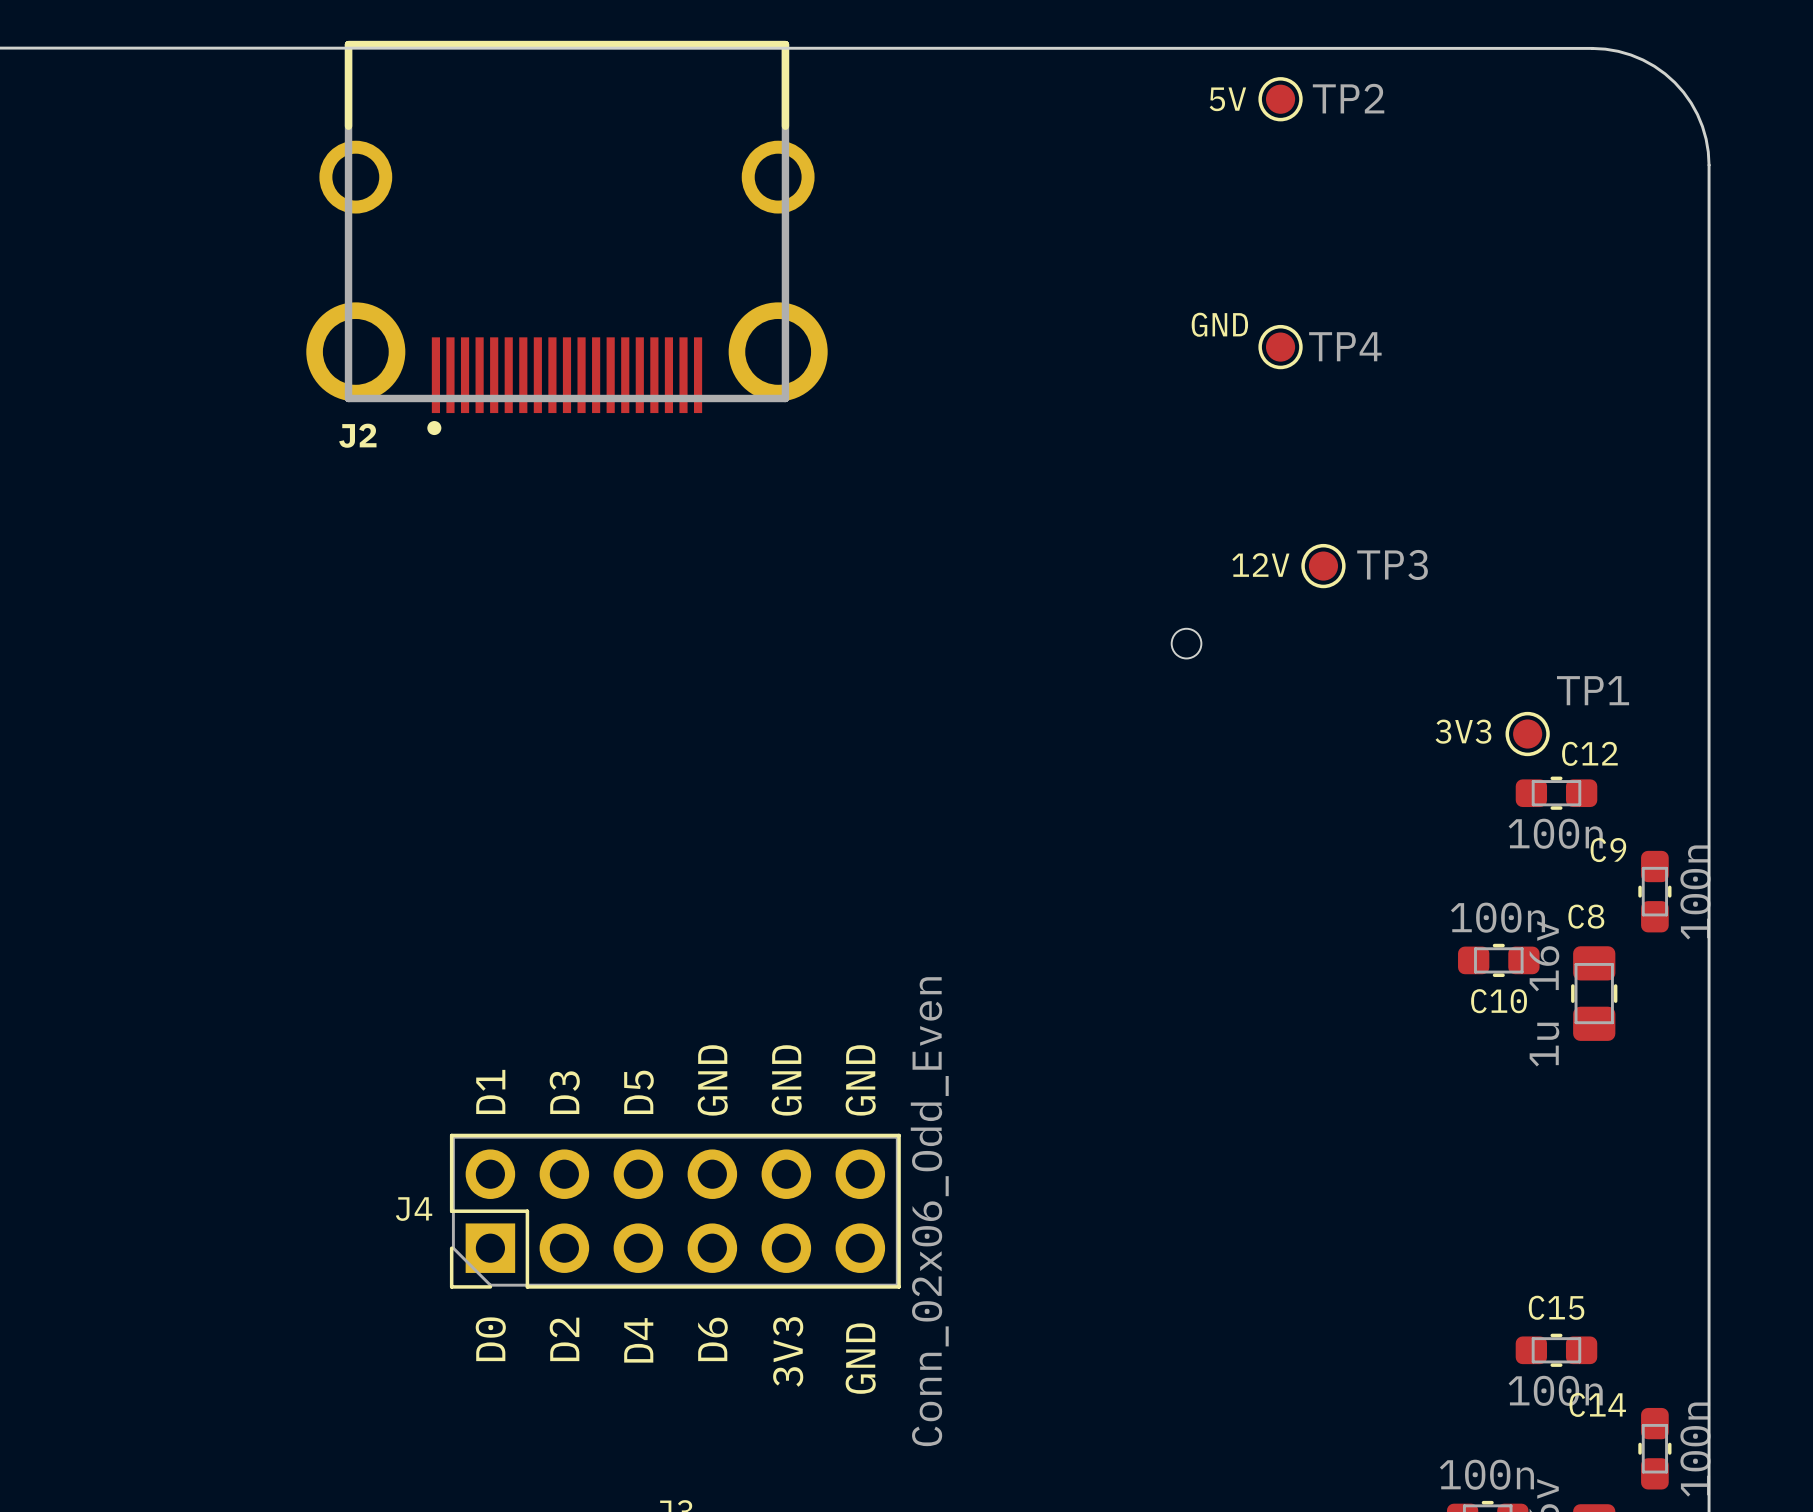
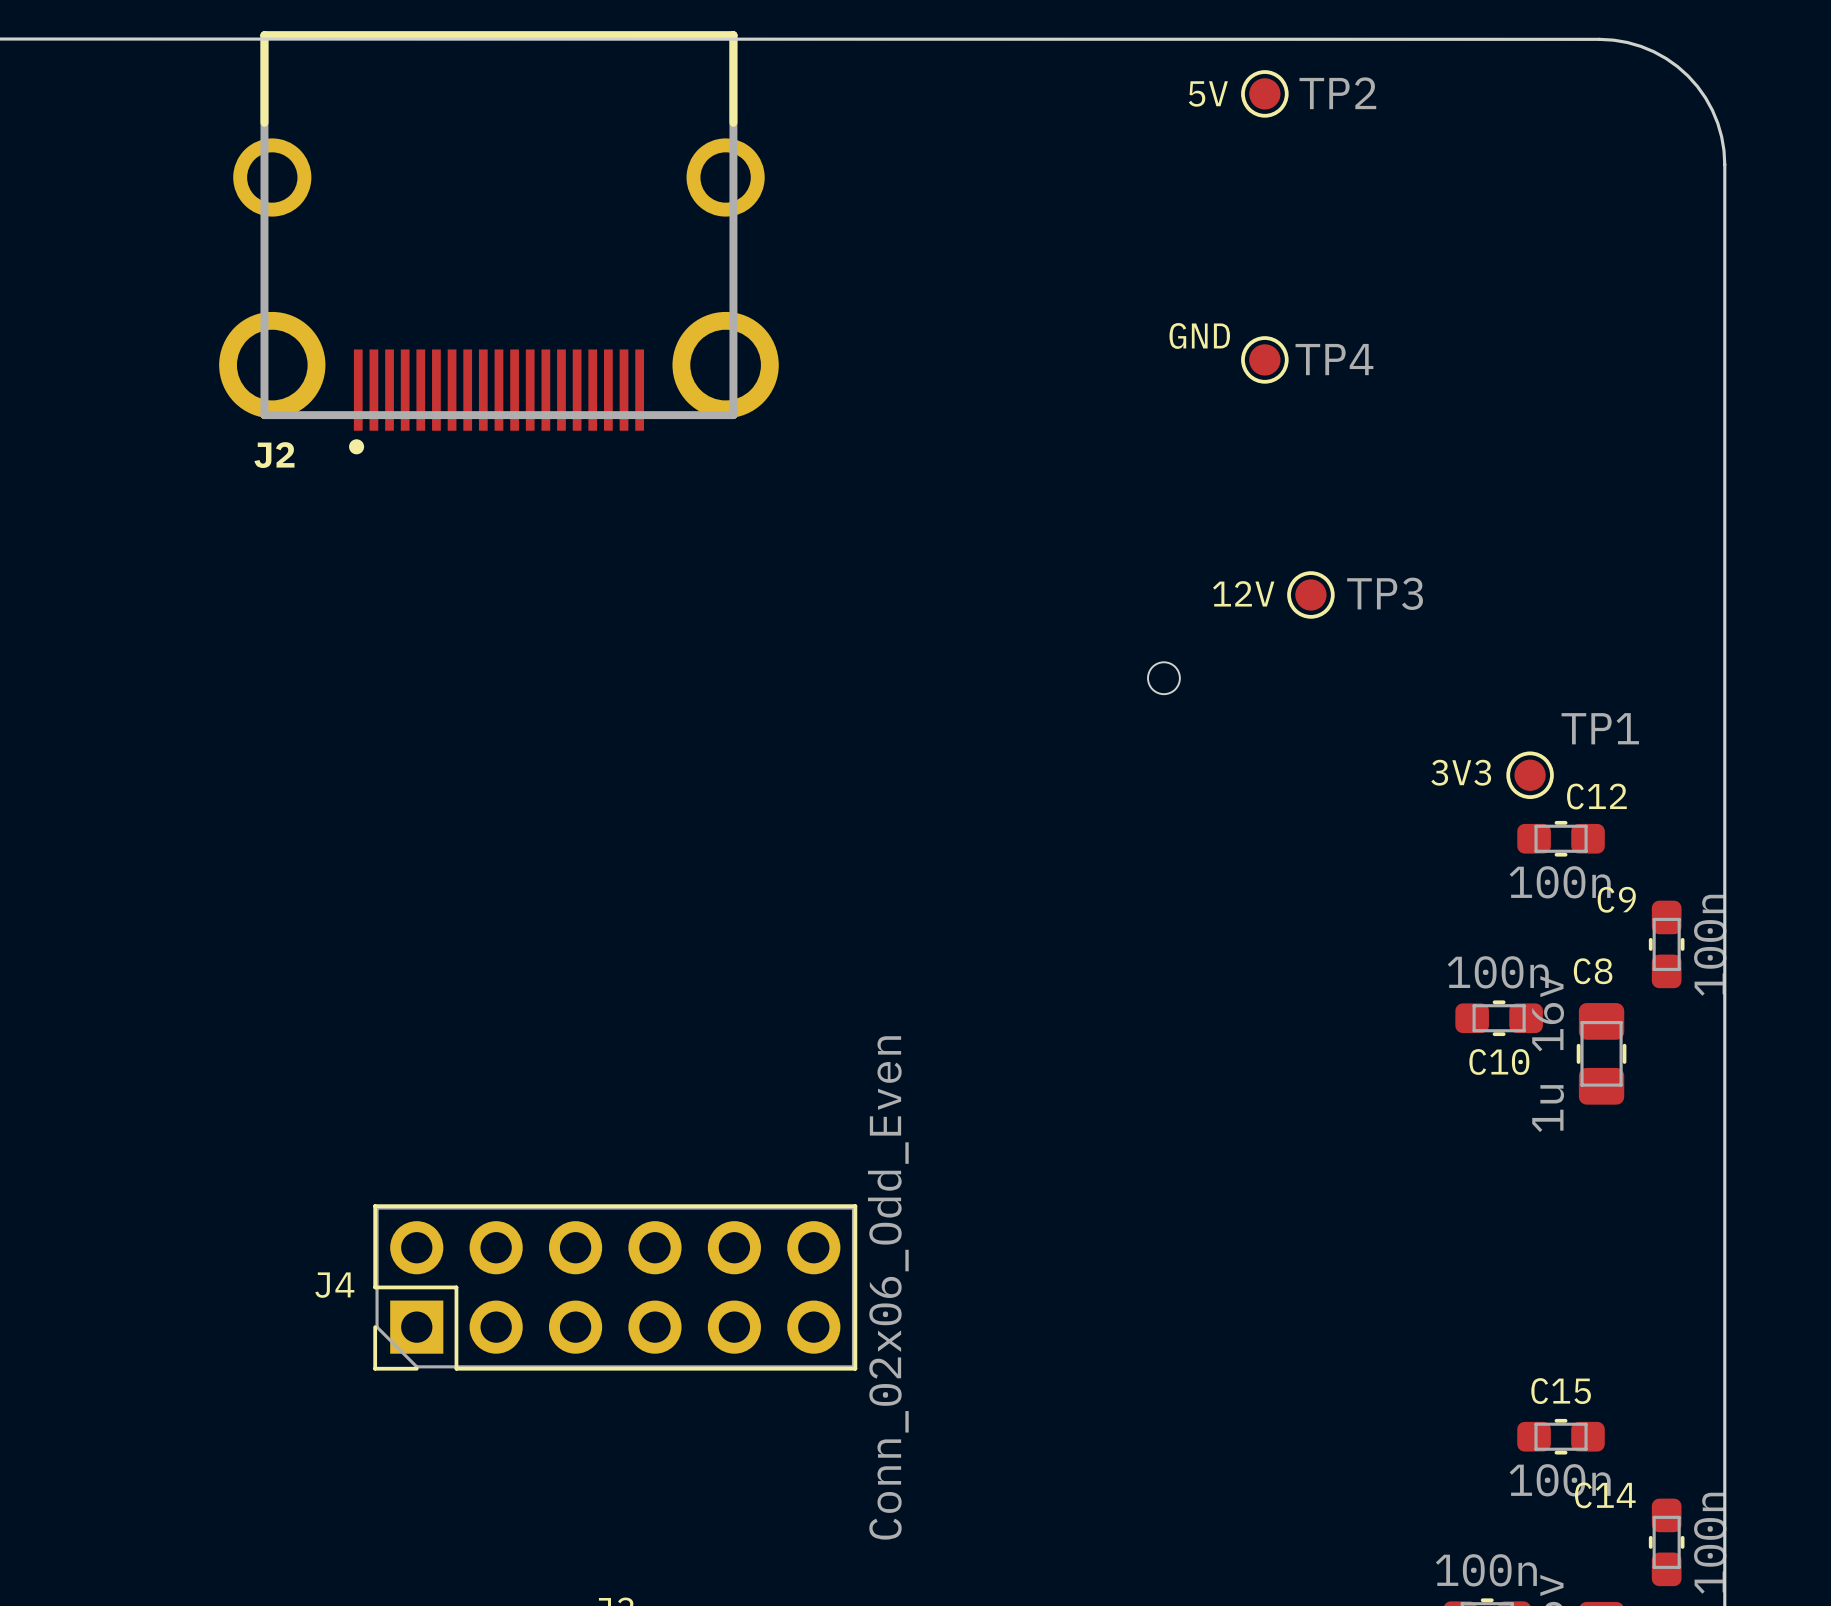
text: GND (712, 1080) -> none
text: GND (786, 1080) -> none
text: GND (860, 1080) -> none
text: D1 (490, 1091) -> none
text: D3 (564, 1092) -> none
text: D5 (638, 1092) -> none
text: D0 (490, 1339) -> none
text: D2 (564, 1339) -> none
text: D6 (712, 1339) -> none
text: D4 (638, 1340) -> none
text: 3V3 (788, 1351) -> none
text: GND (860, 1358) -> none

